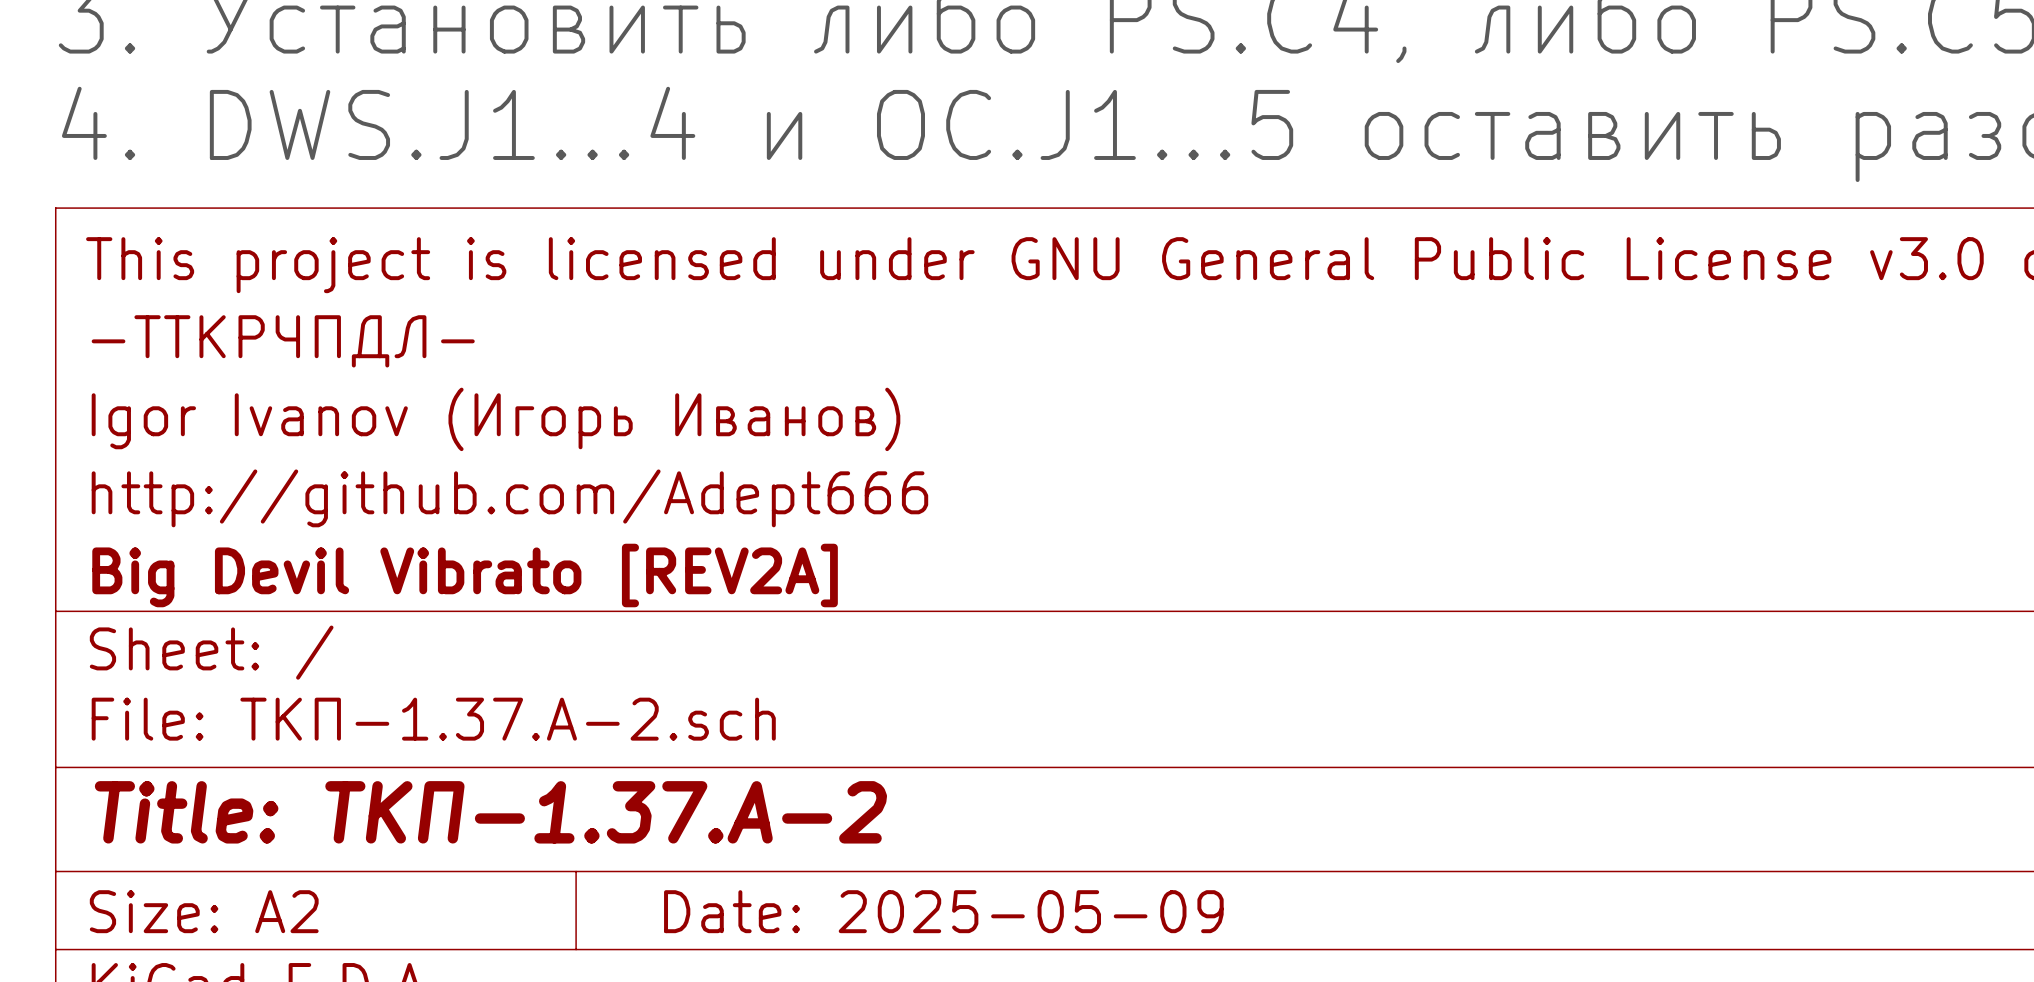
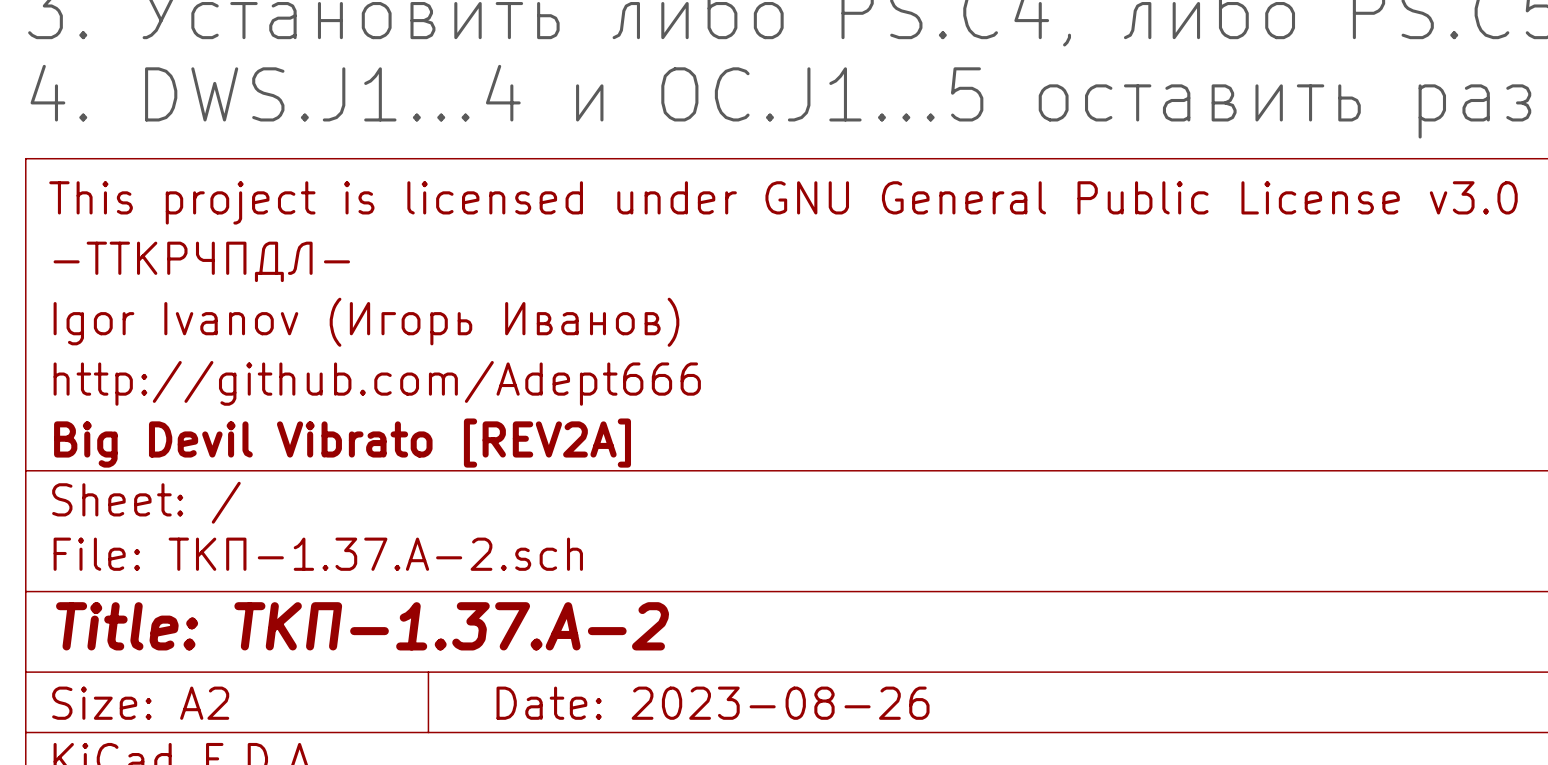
title block: Date: 2025-05-09 (943, 911) -> Date: 2023-08-26 (713, 703)

